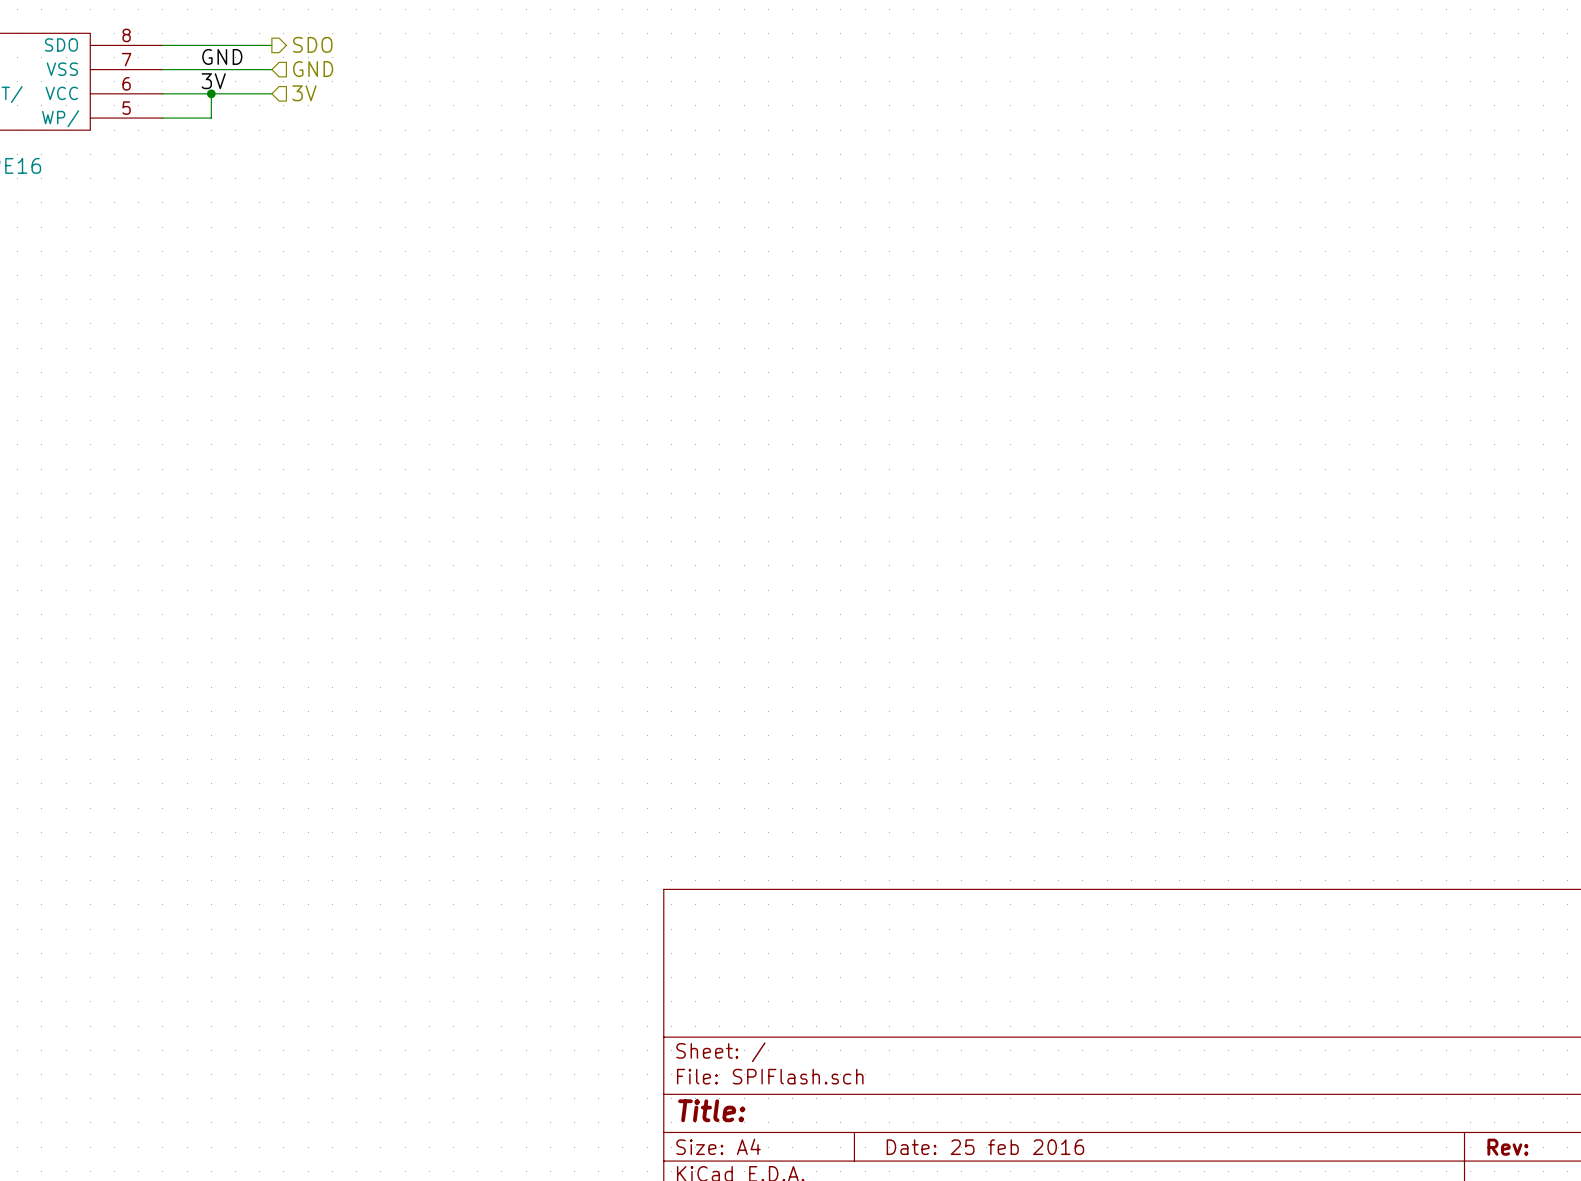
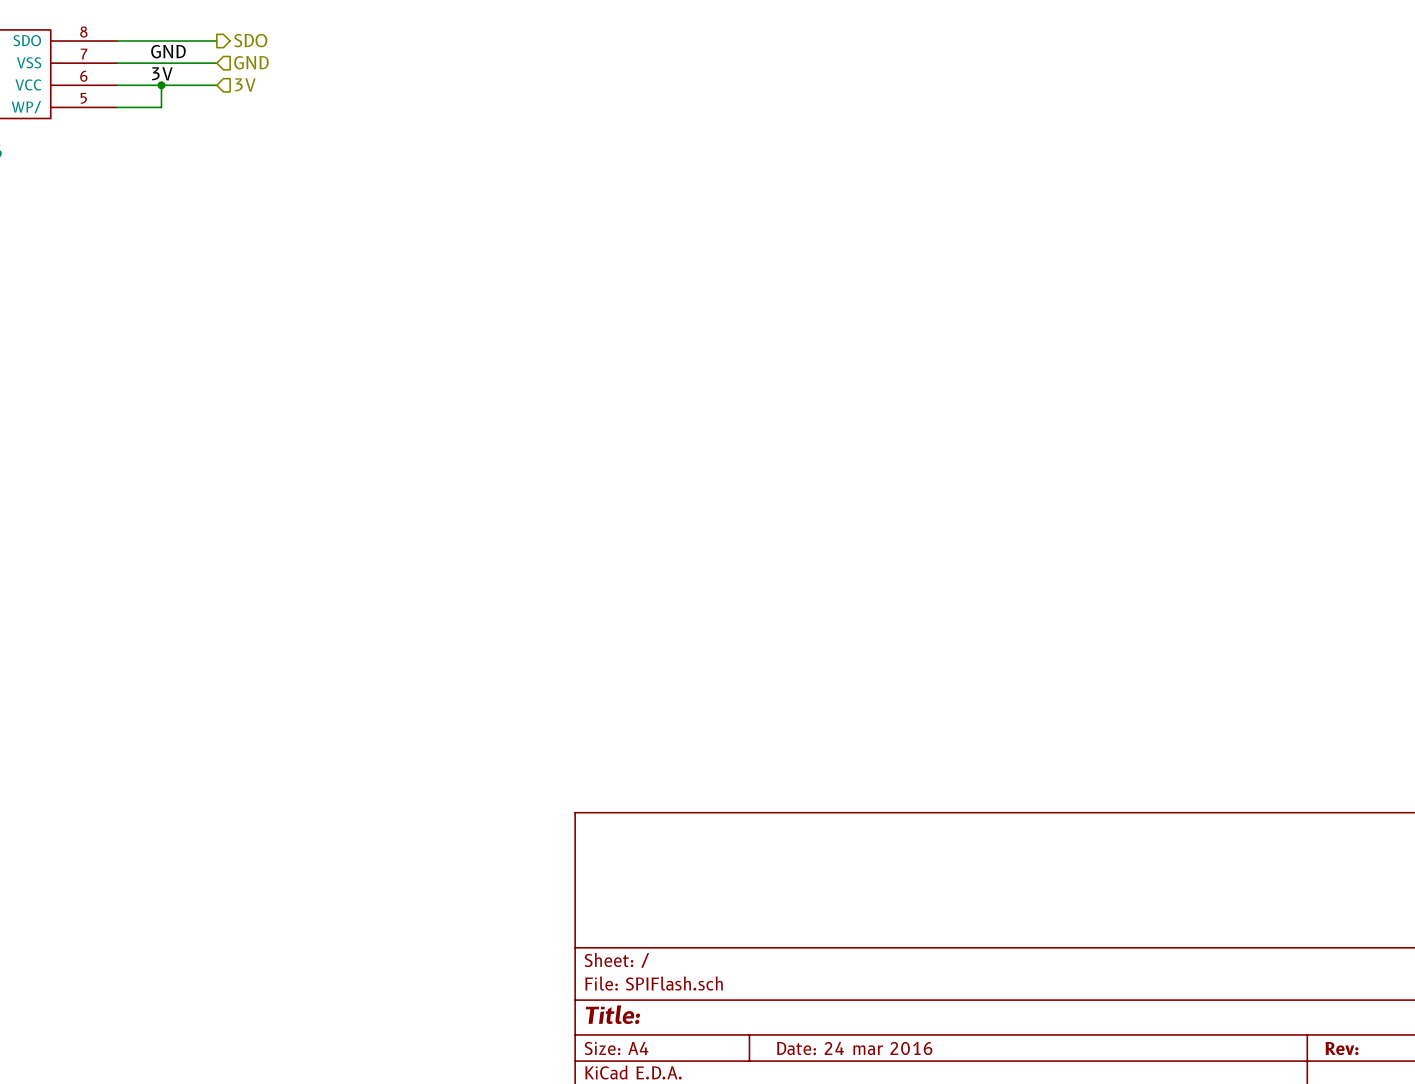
title block: Date: 25 feb 2016 (985, 1147) -> Date: 24 mar 2016 (854, 1048)

